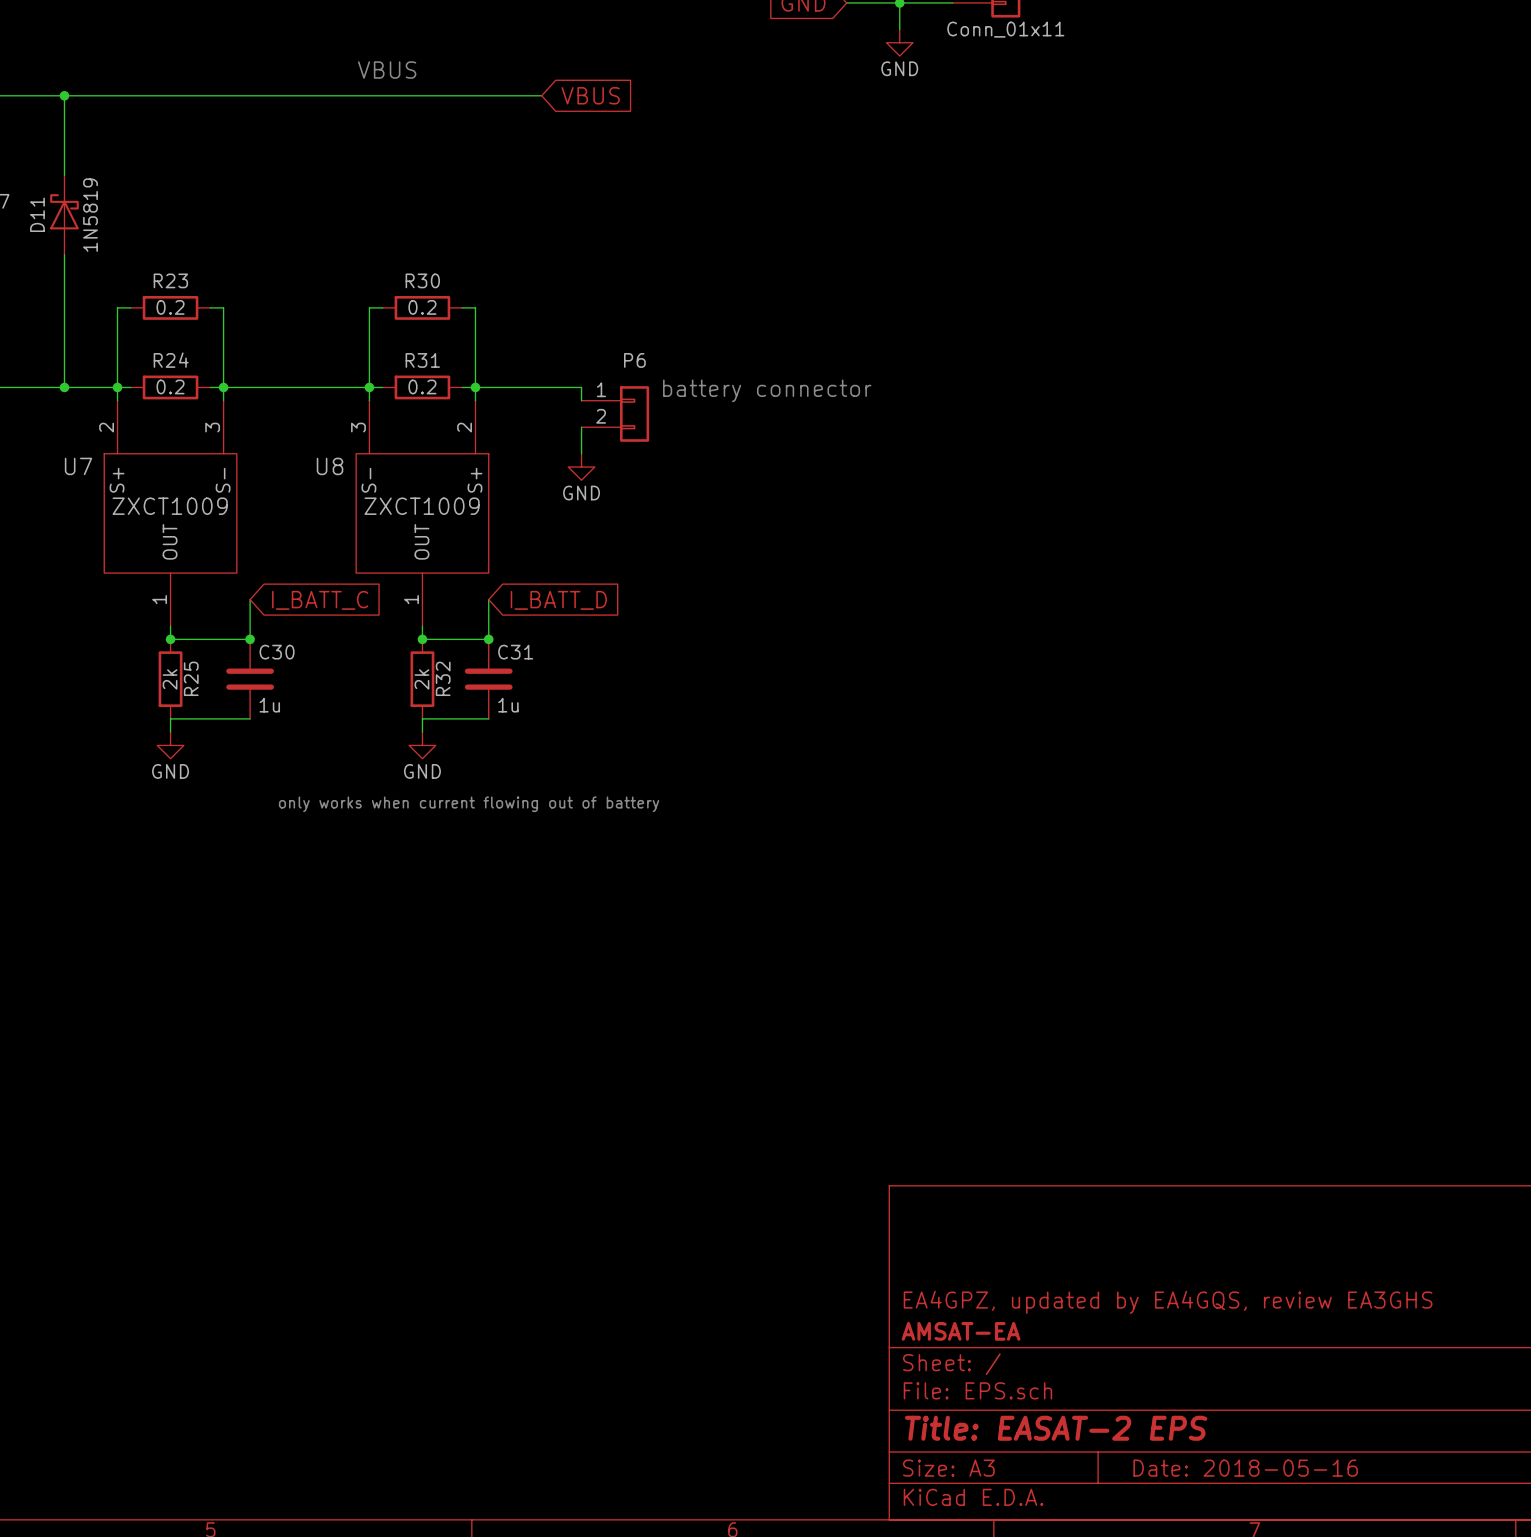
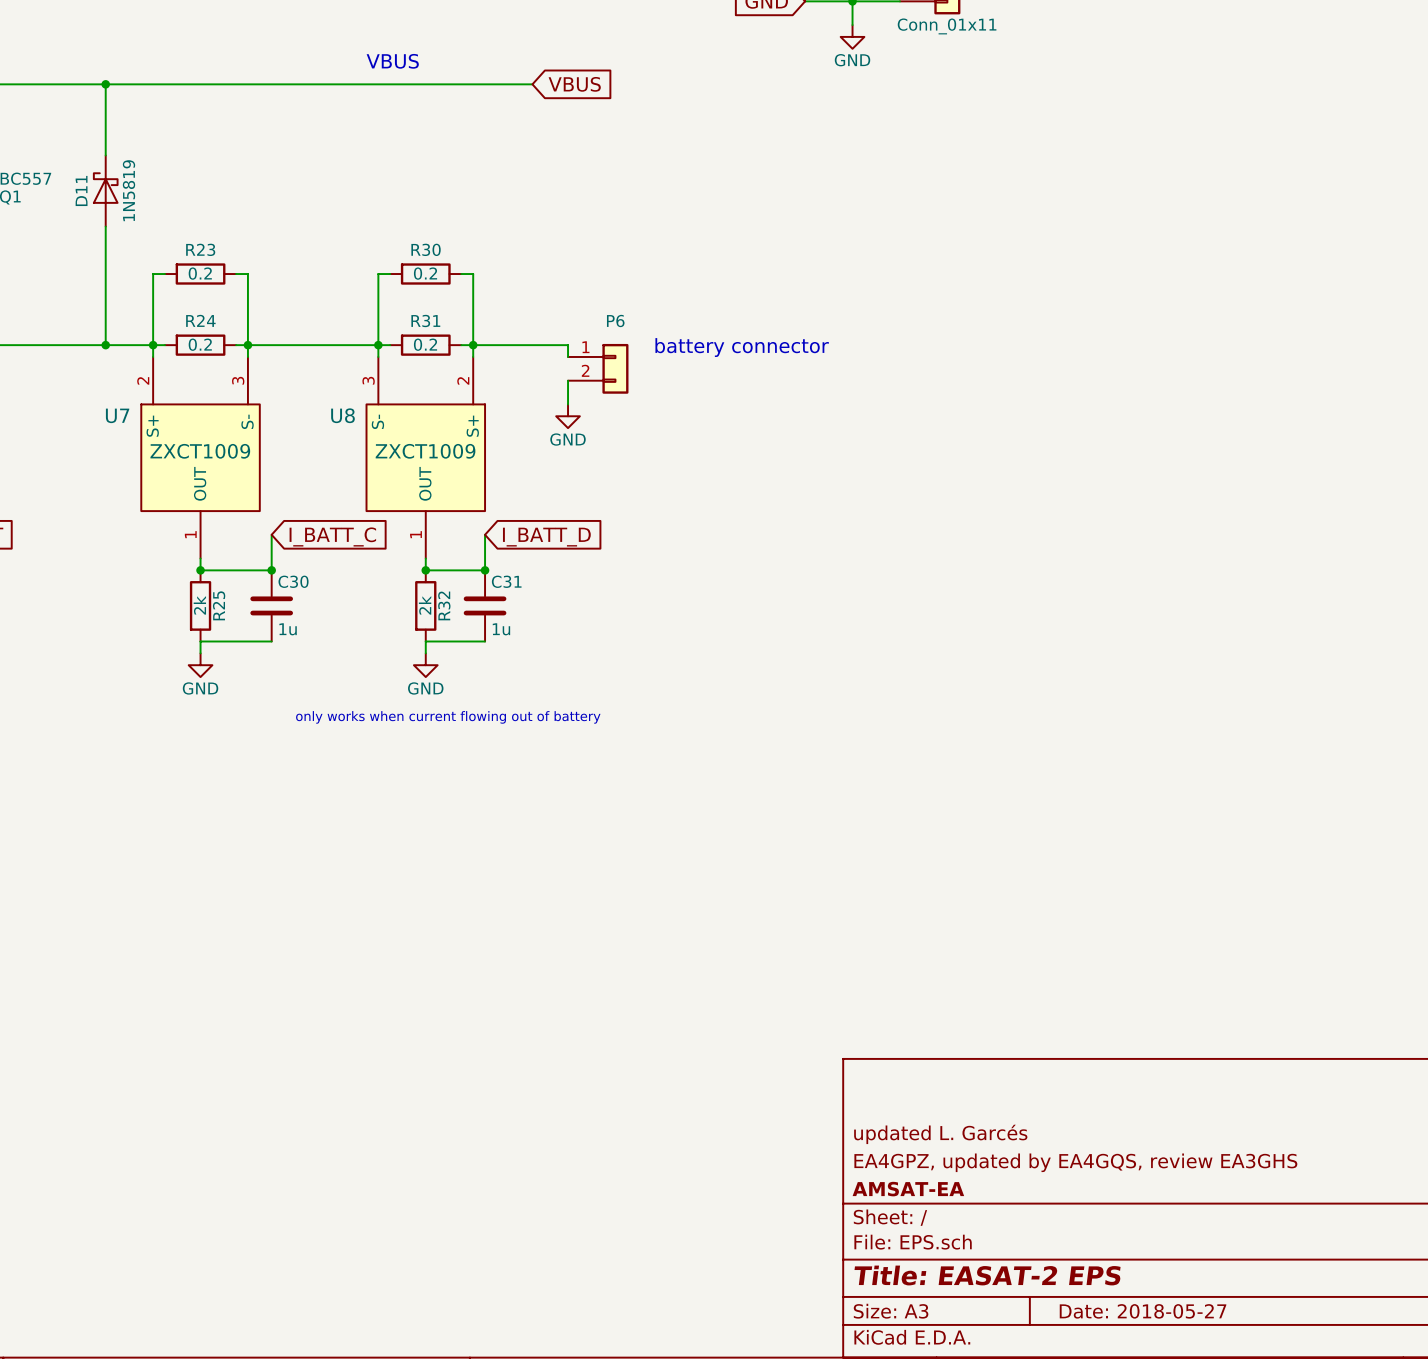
title block: none -> updated L. Garcés (940, 1134)
title block: Date: 2018-05-16 (1245, 1468) -> Date: 2018-05-27 (1143, 1311)

